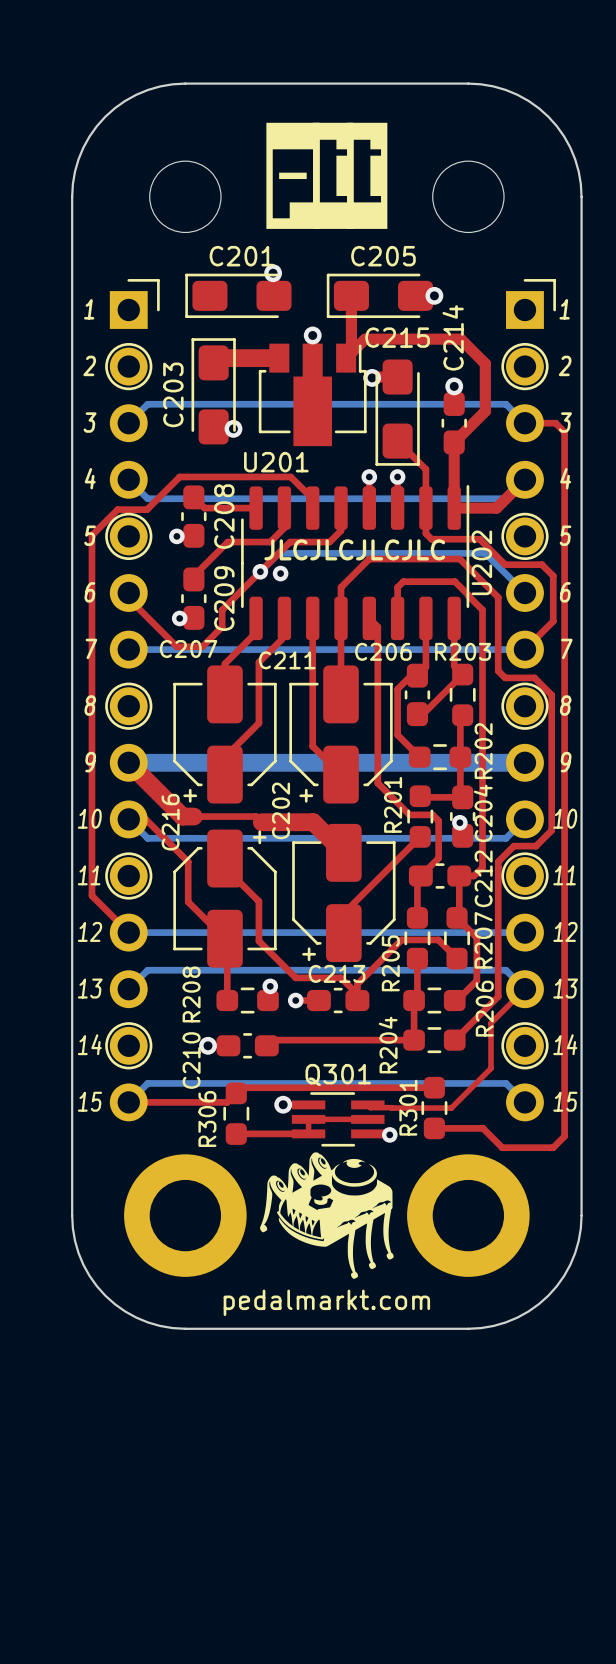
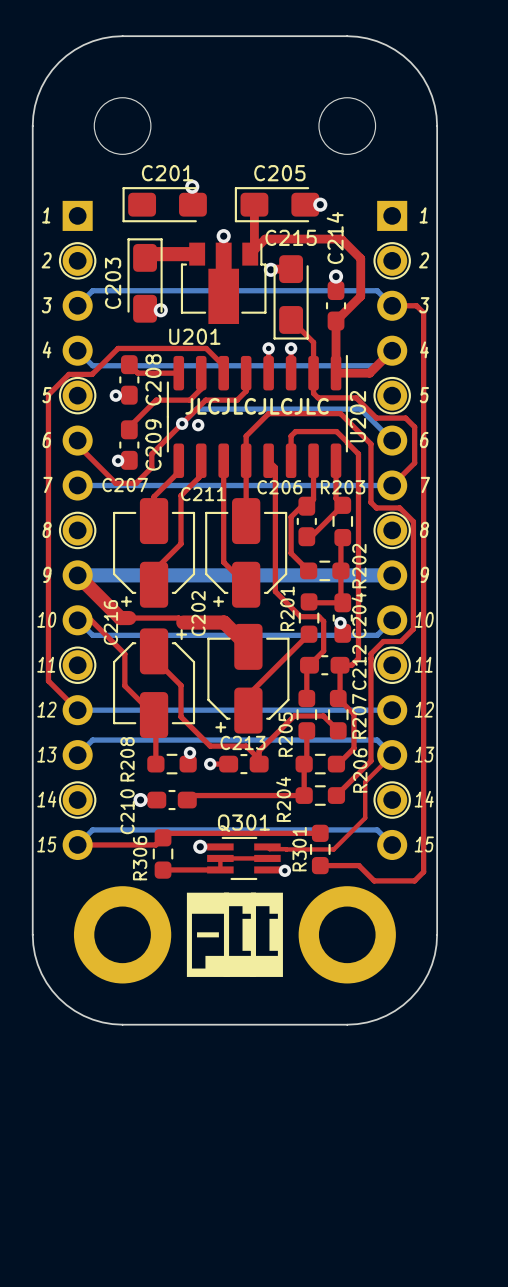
drawing: [266, 122, 388, 229] -> none
part footprint: [109, 279, 160, 1122] -> [62, 200, 93, 861]
part footprint: [506, 279, 556, 1122] -> [377, 200, 408, 861]
drawing shape: [260, 1152, 394, 1279] -> [186, 892, 283, 977]
text: pedalmarkt.com (326, 1302) -> none

